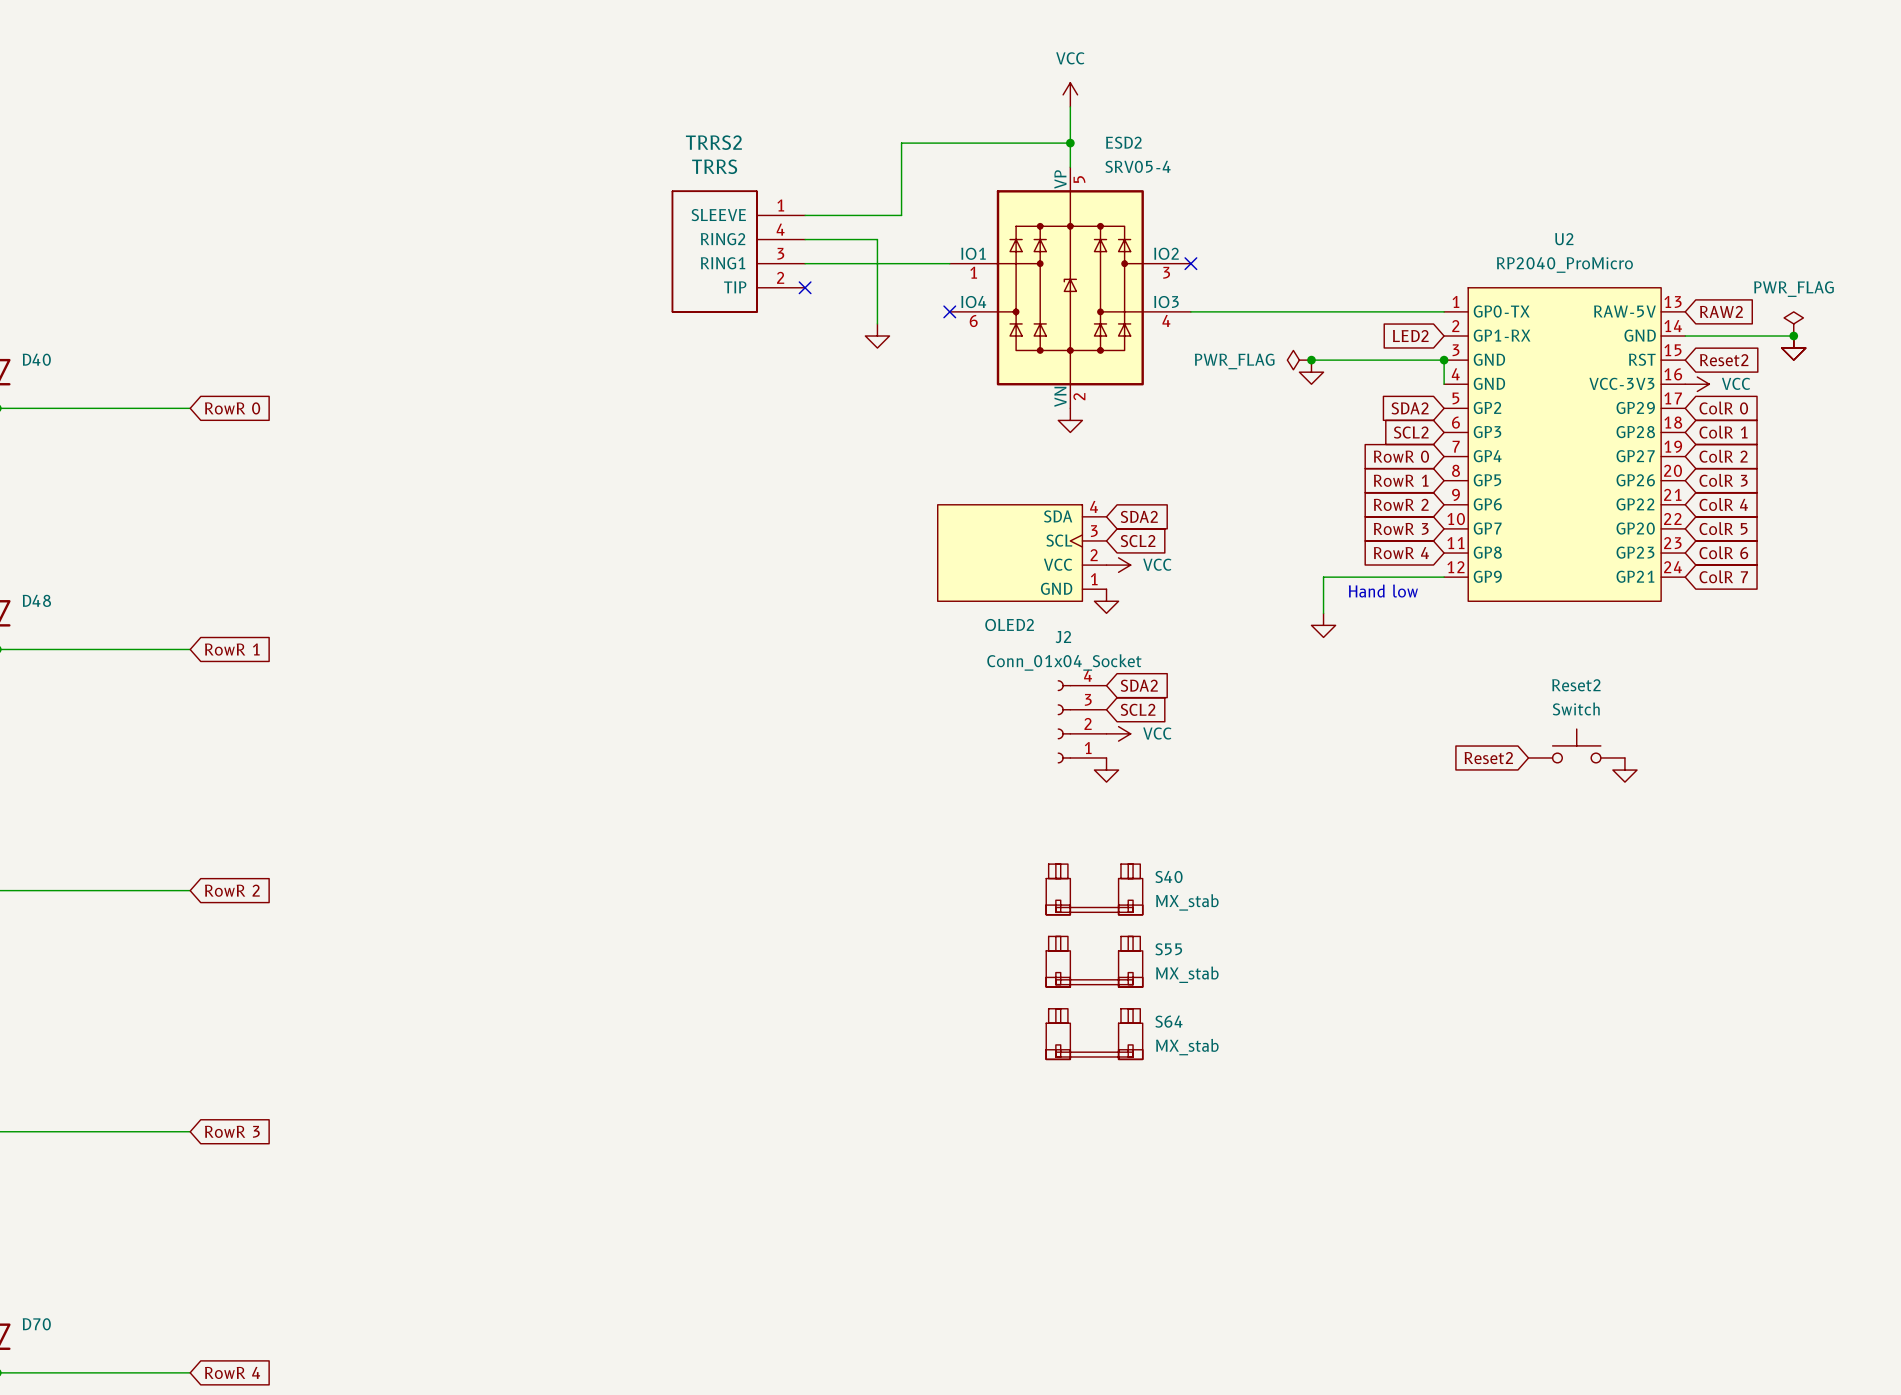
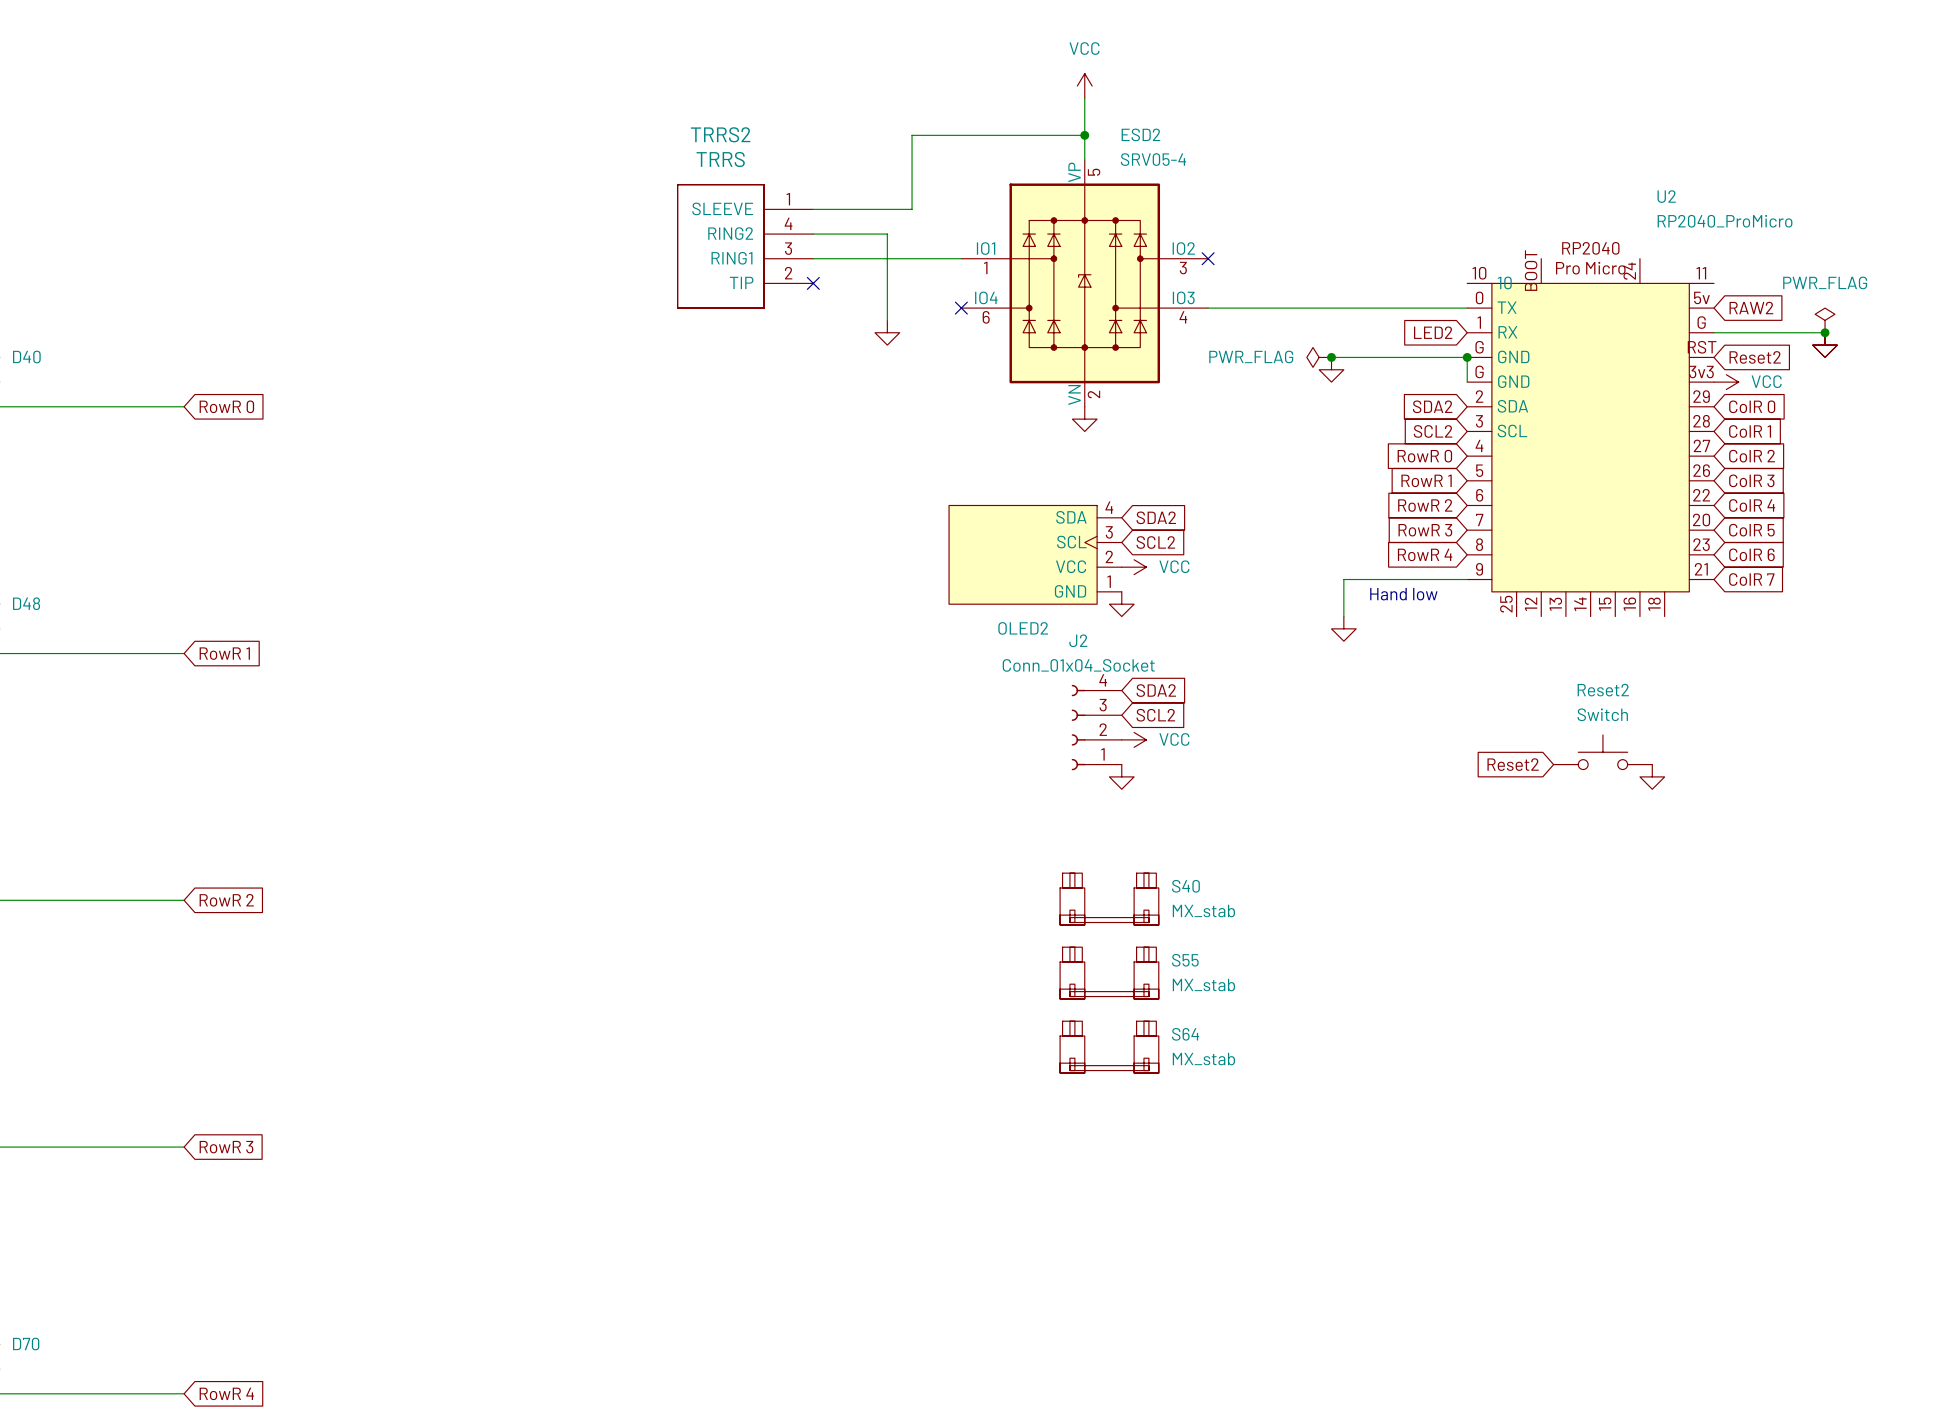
U2 name position: U2 (1564, 239) -> U2 (1666, 196)
U2 value position: RP2040_ProMicro (1564, 265) -> RP2040_ProMicro (1725, 221)
U2 symbol: [1444, 287, 1686, 602] -> [1467, 258, 1714, 617]

